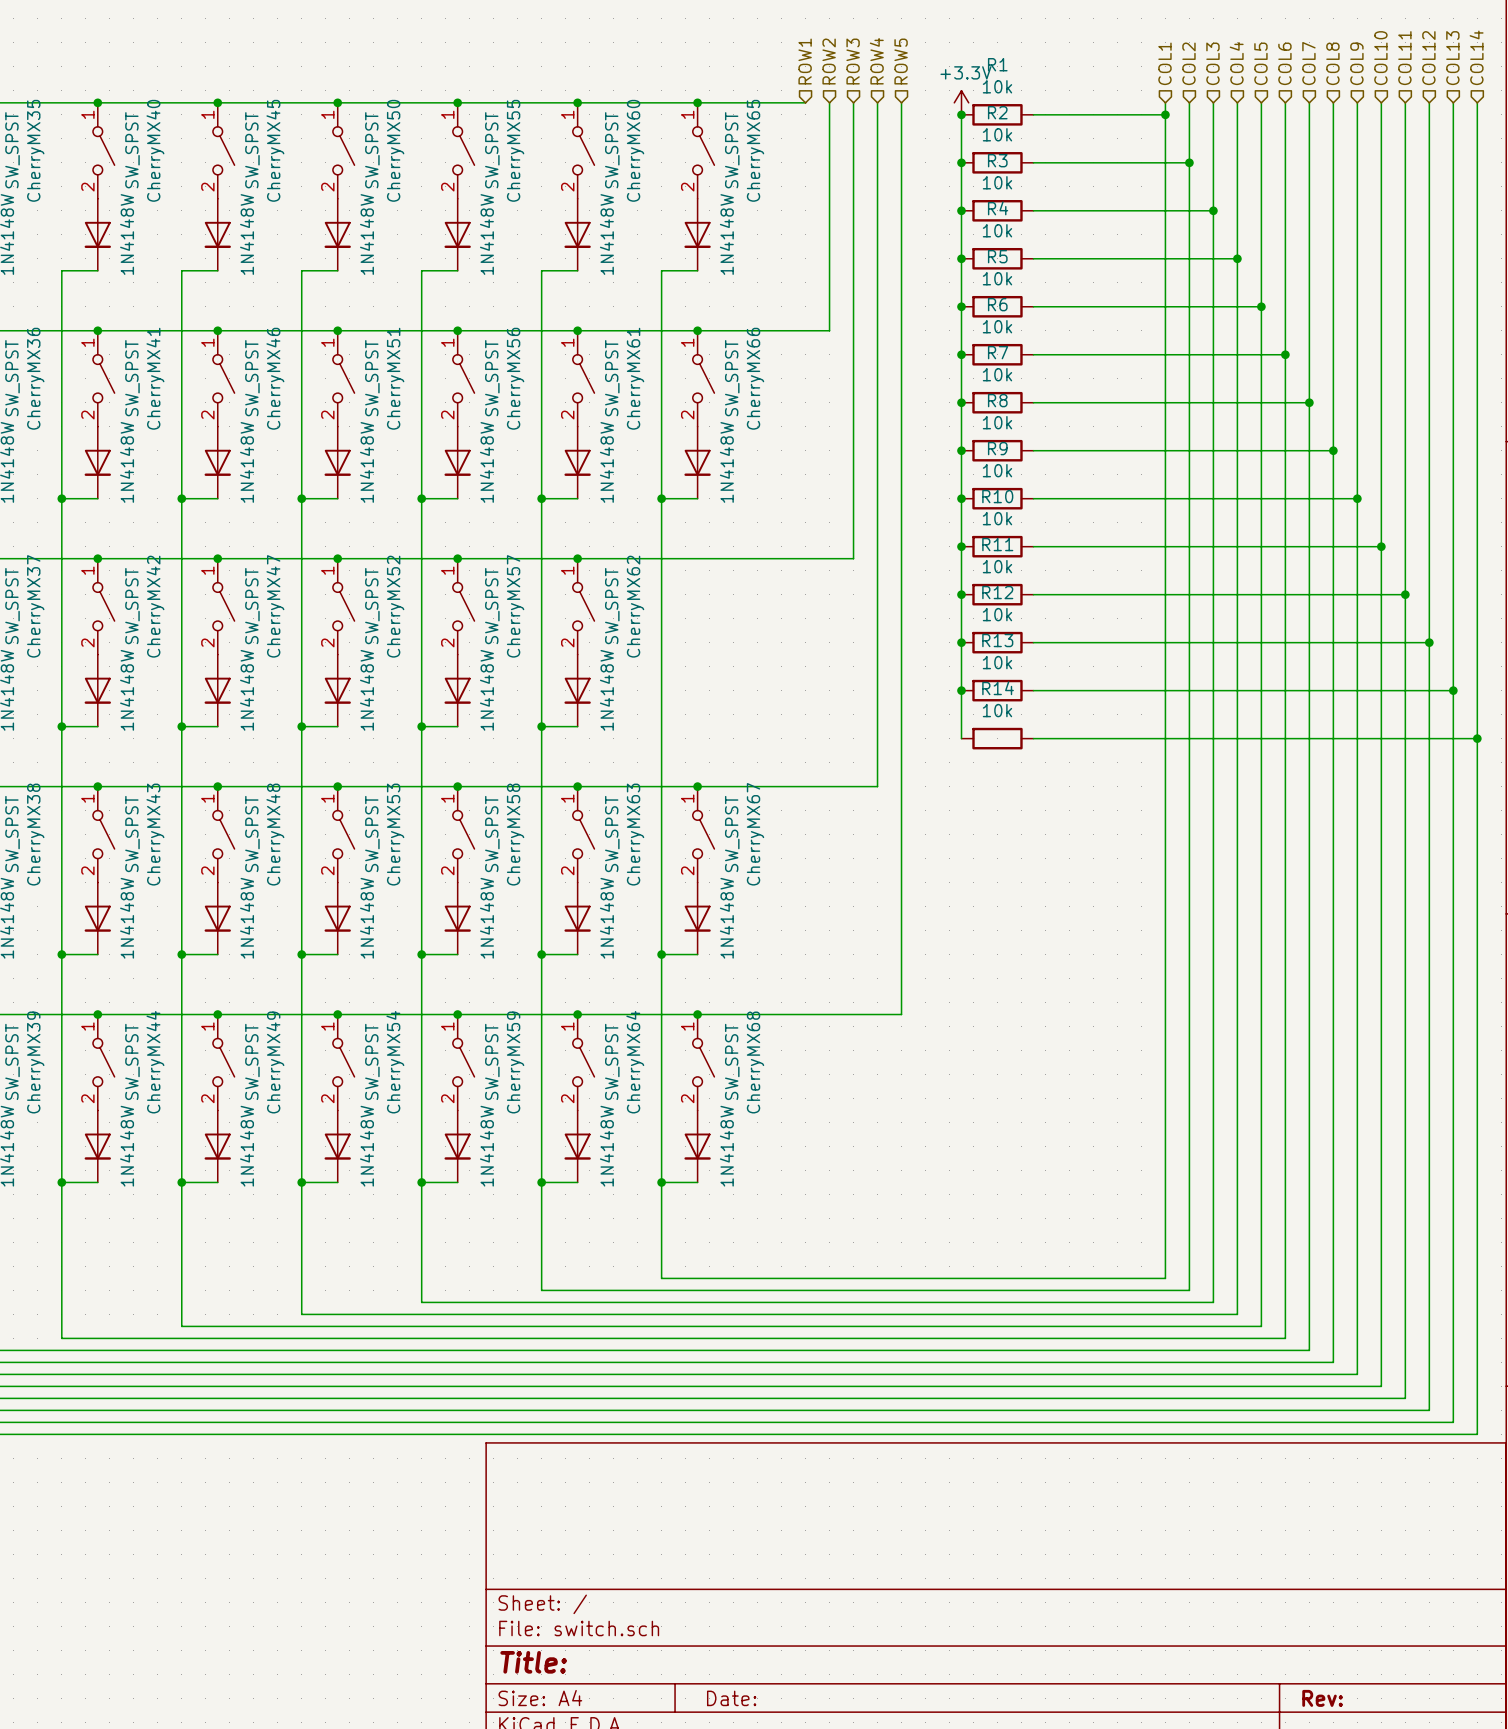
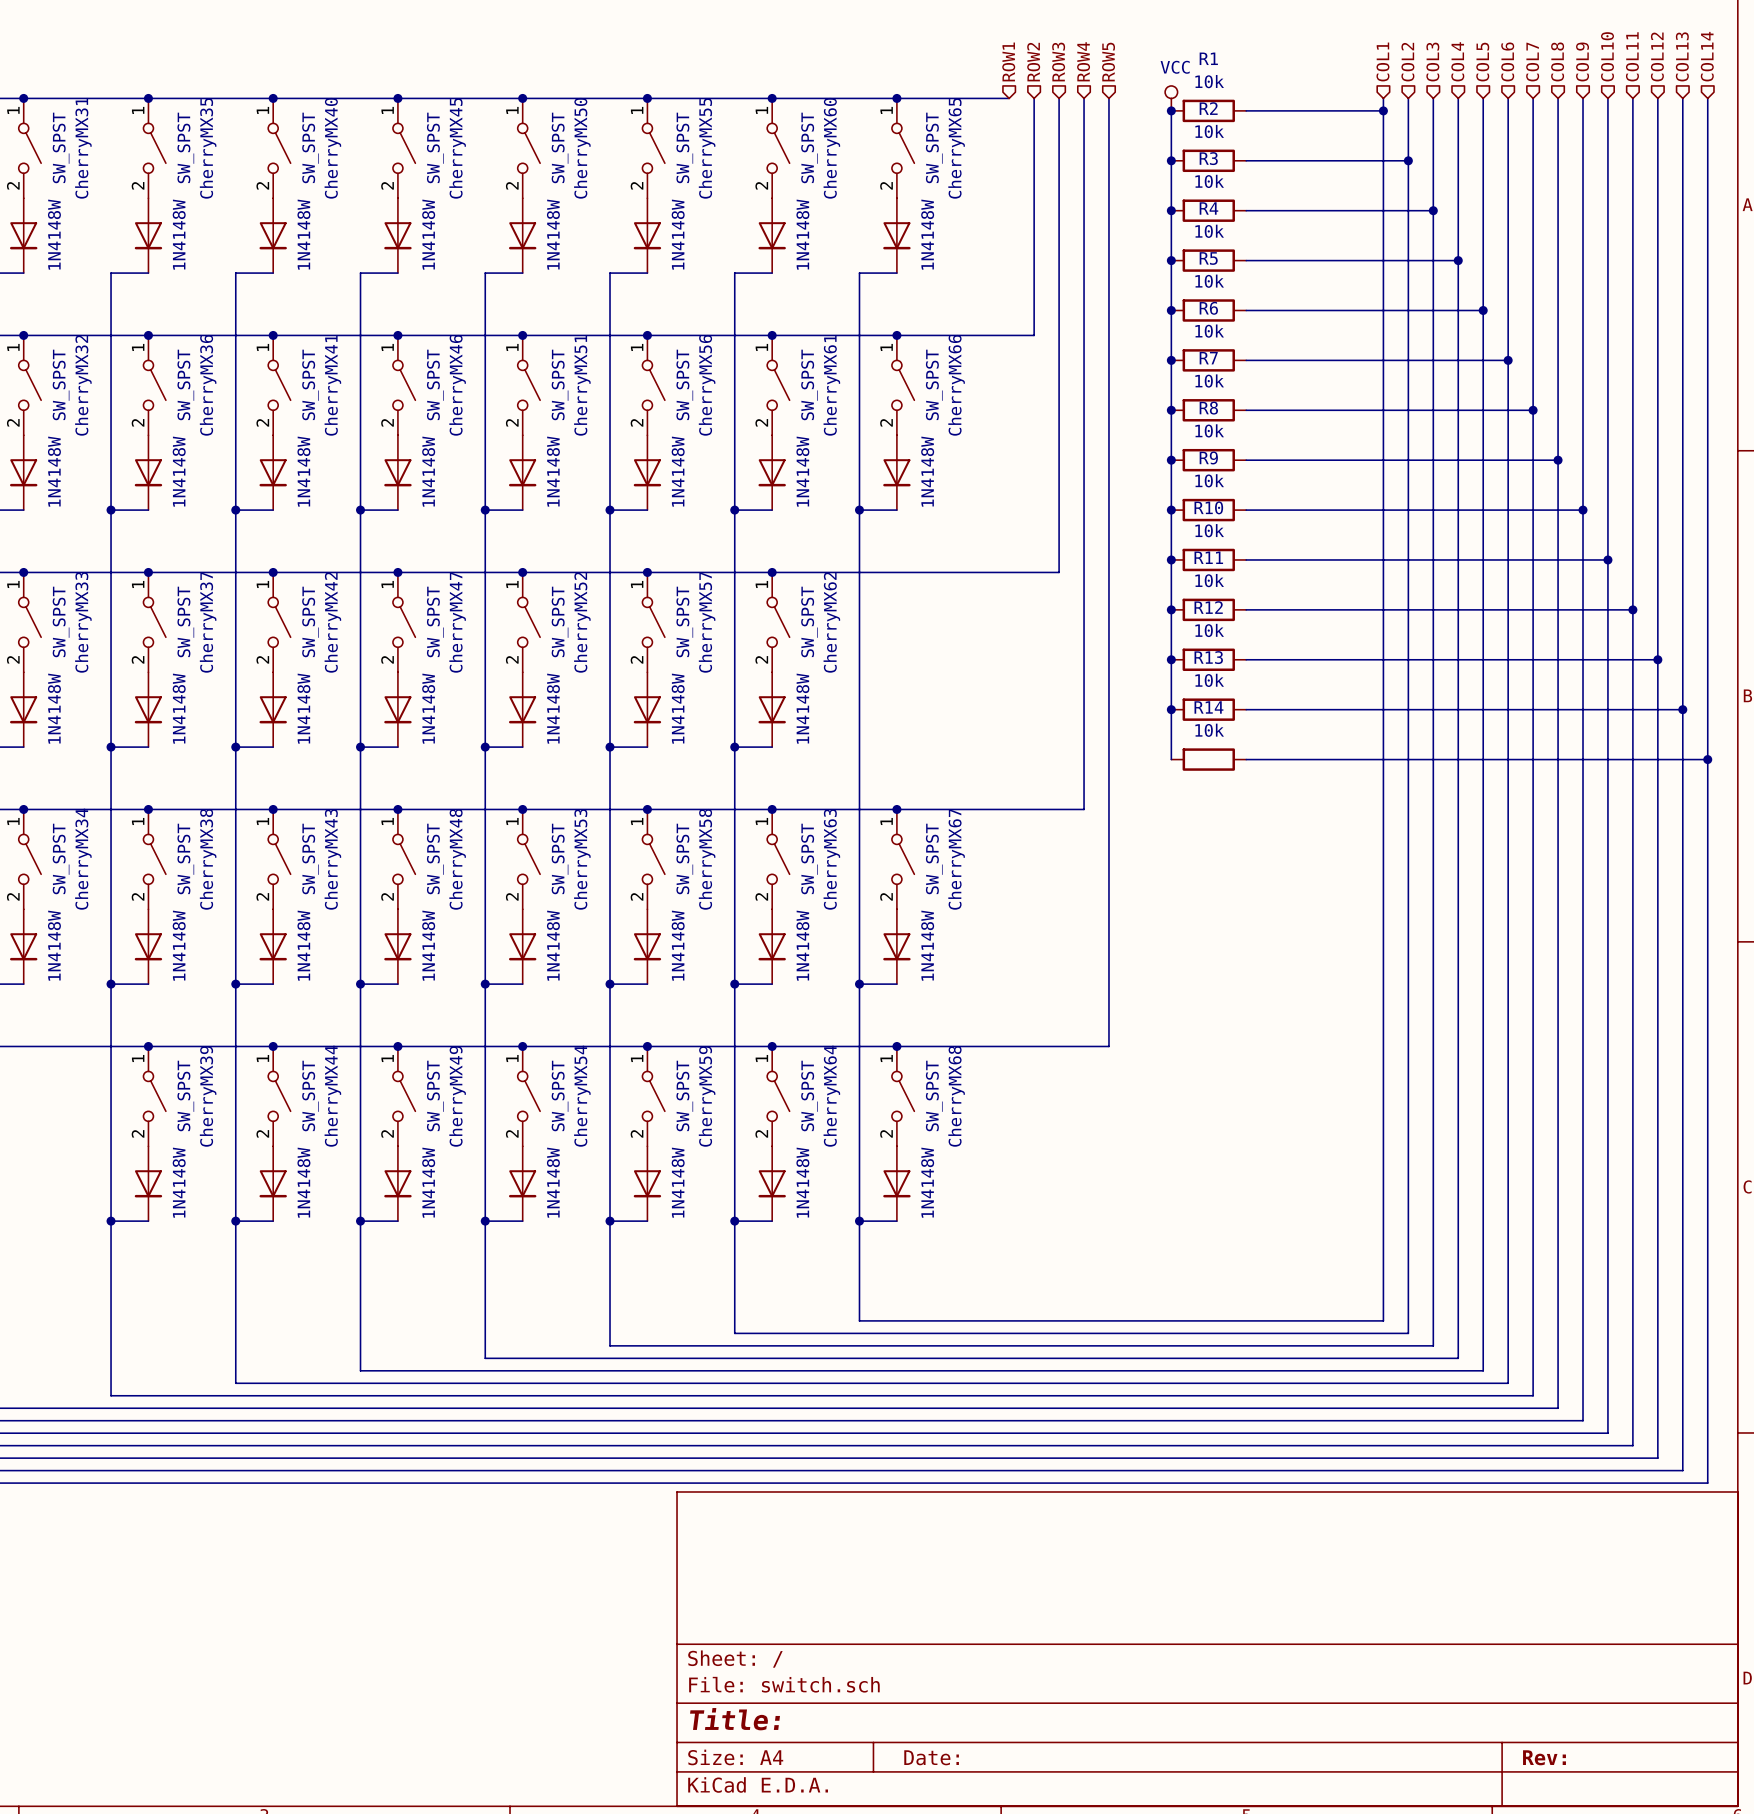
power symbol: +3.3V (961, 102) -> VCC (1171, 98)

